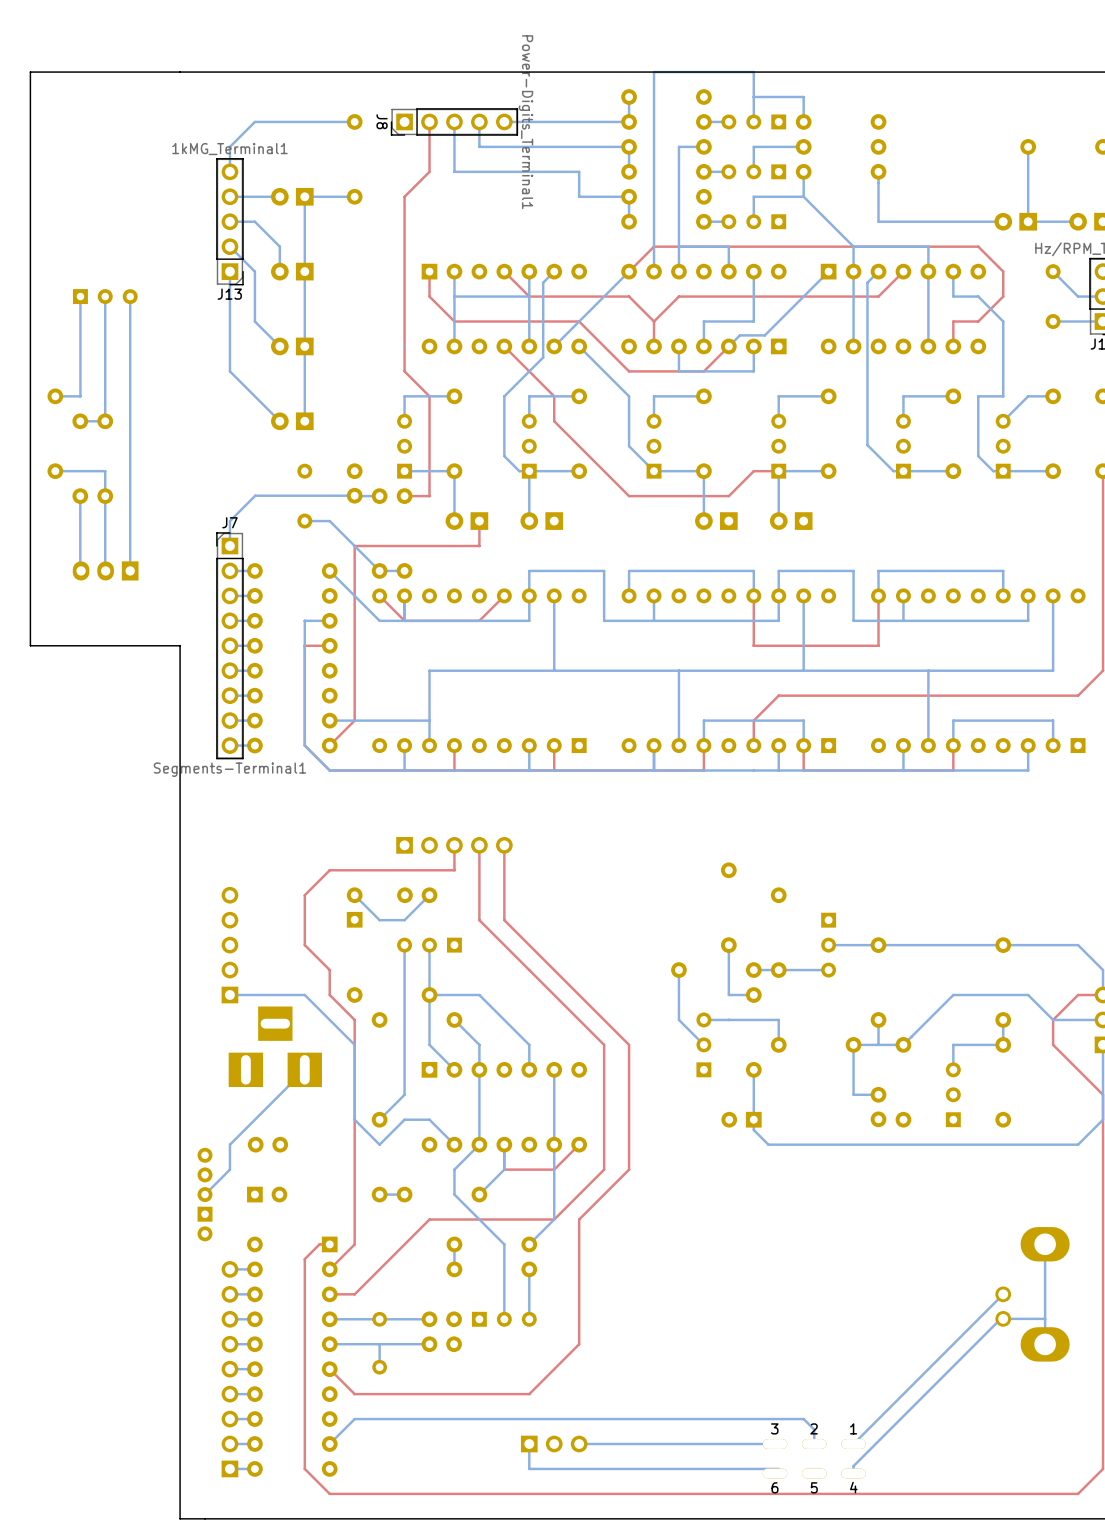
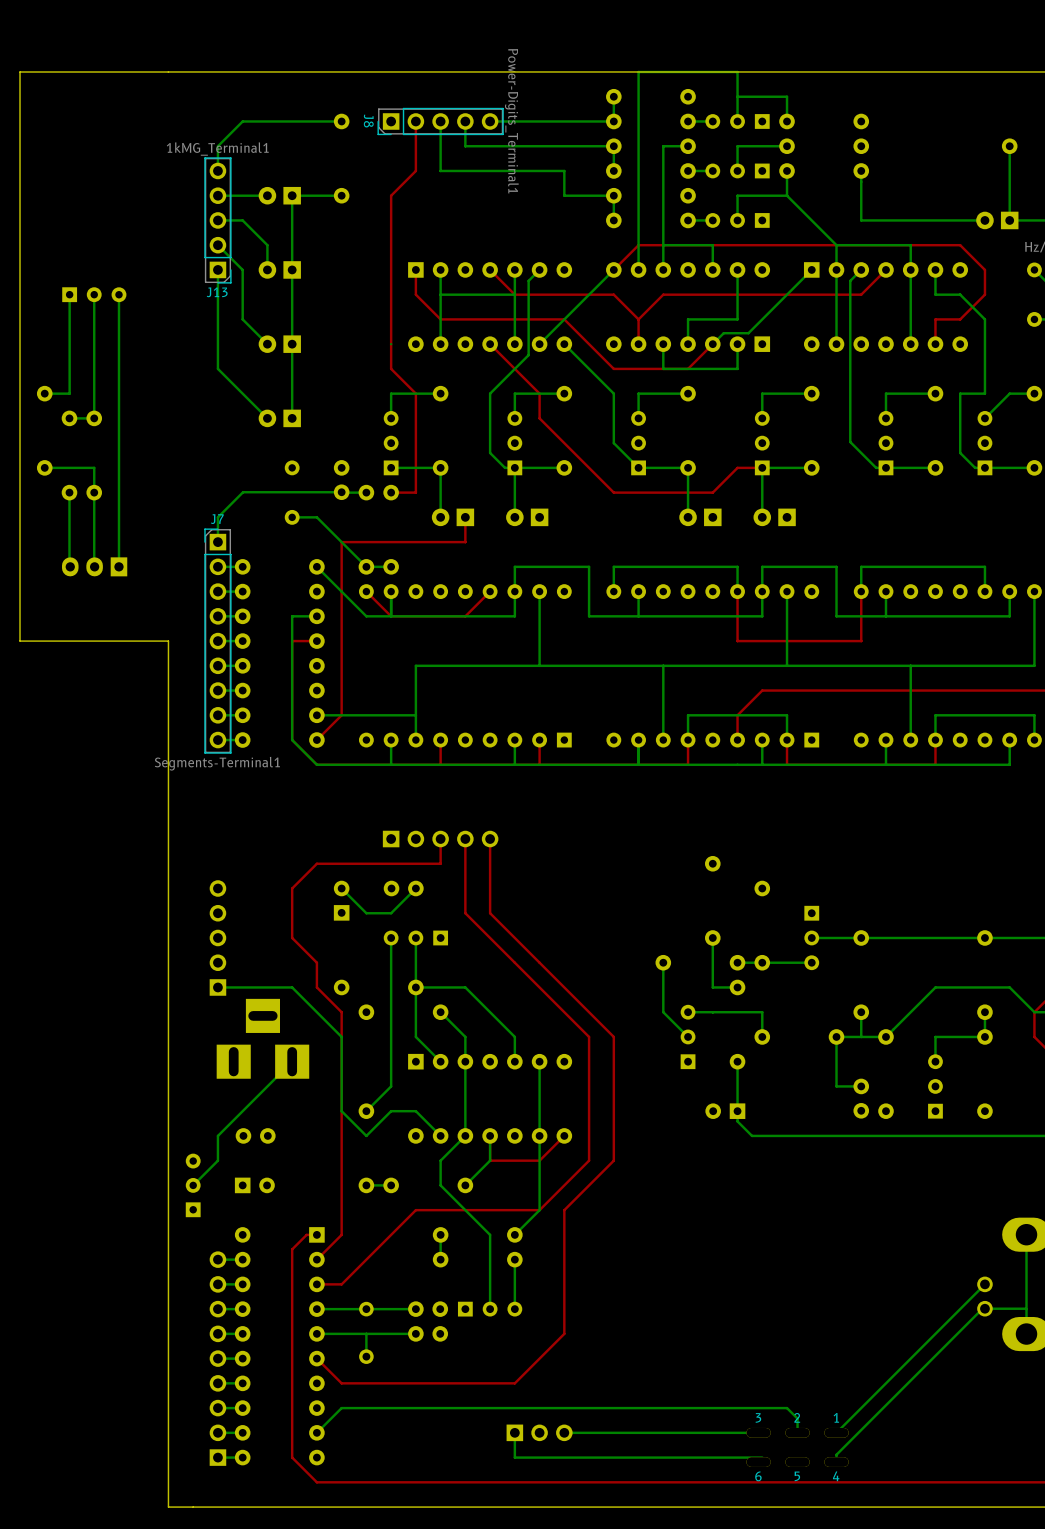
part footprint: [197, 1147, 213, 1242] -> [185, 1153, 201, 1218]

